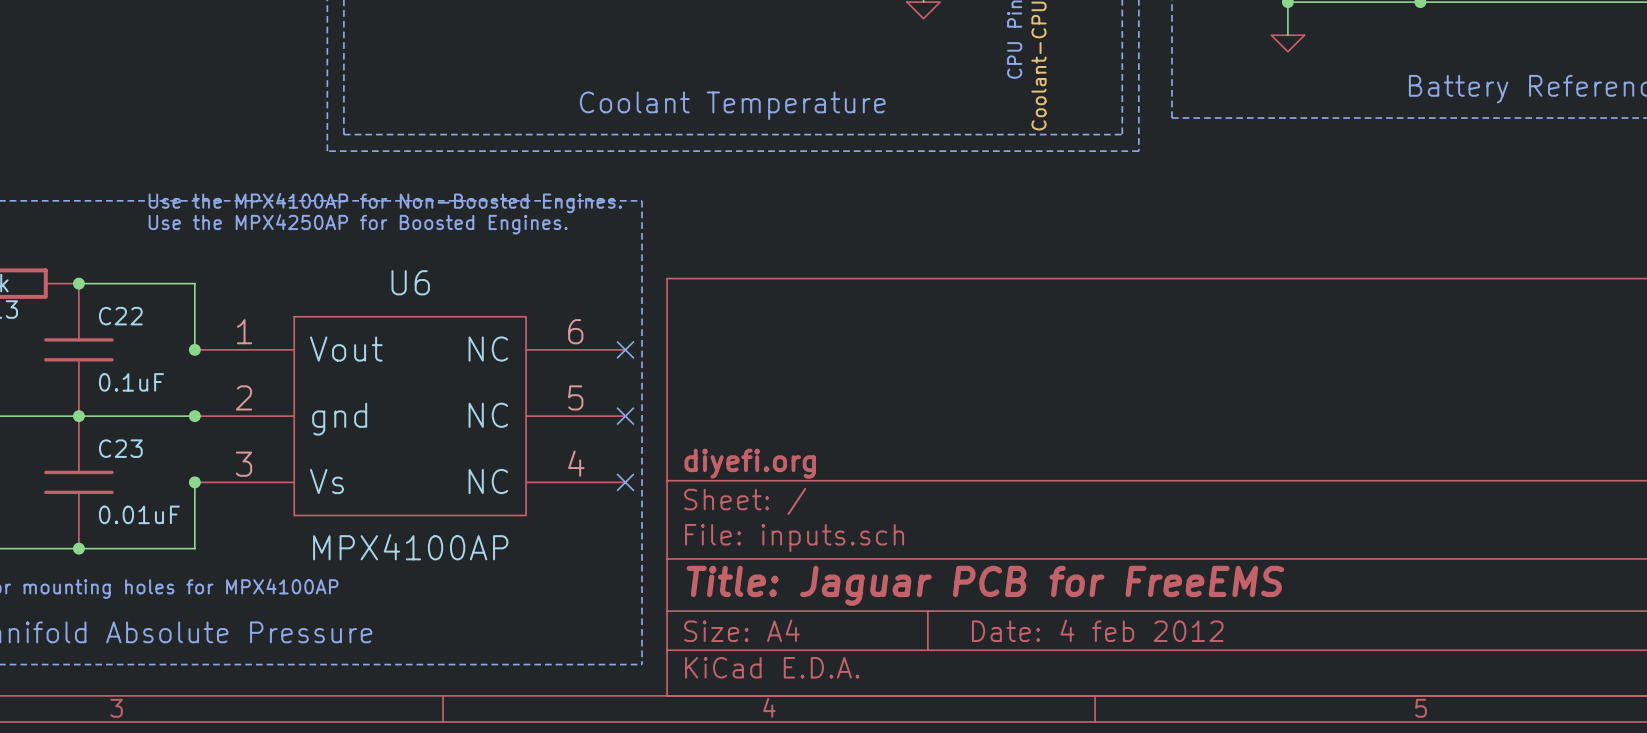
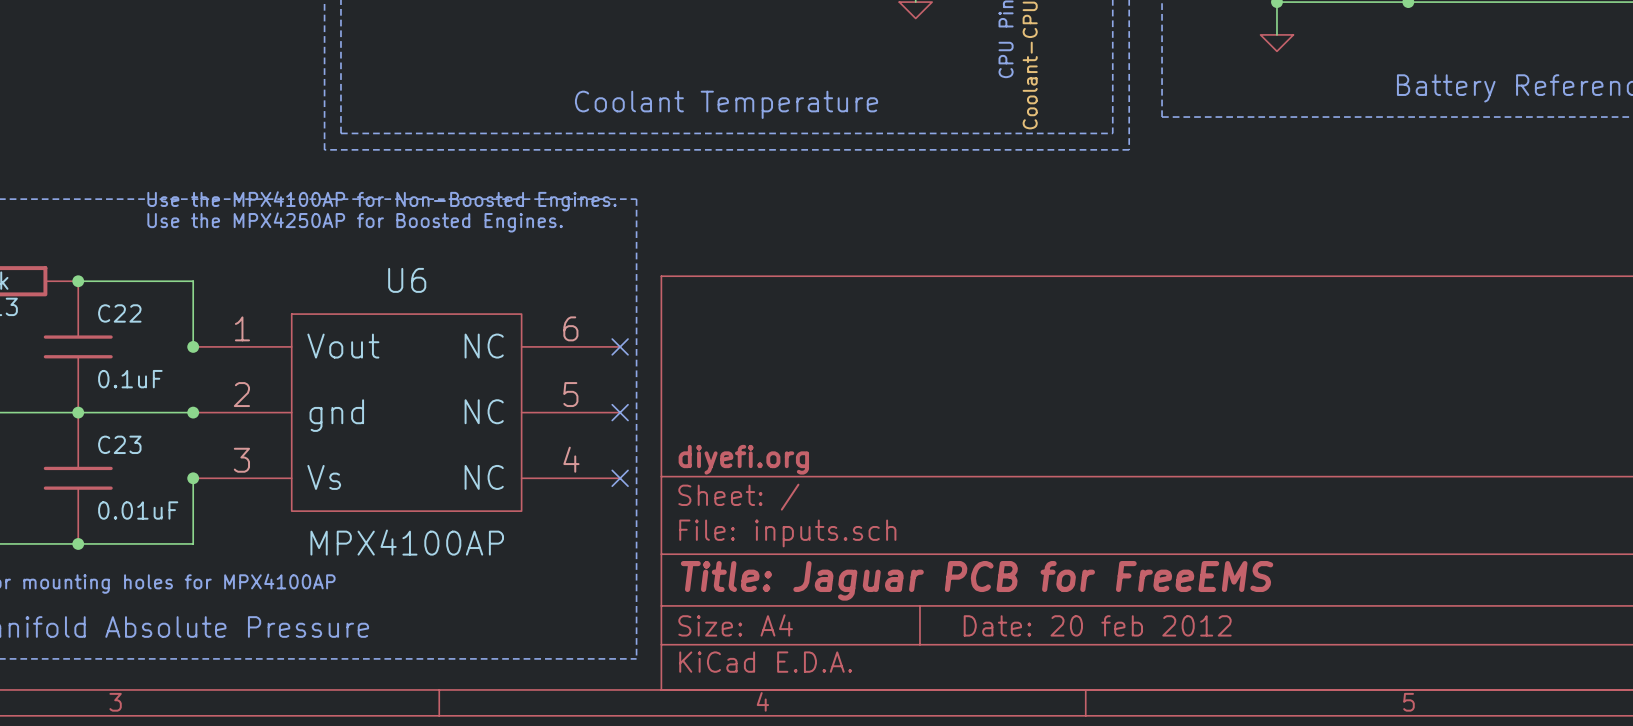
title block: Date: 4 feb 2012 (1097, 630) -> Date: 20 feb 2012 (1097, 625)

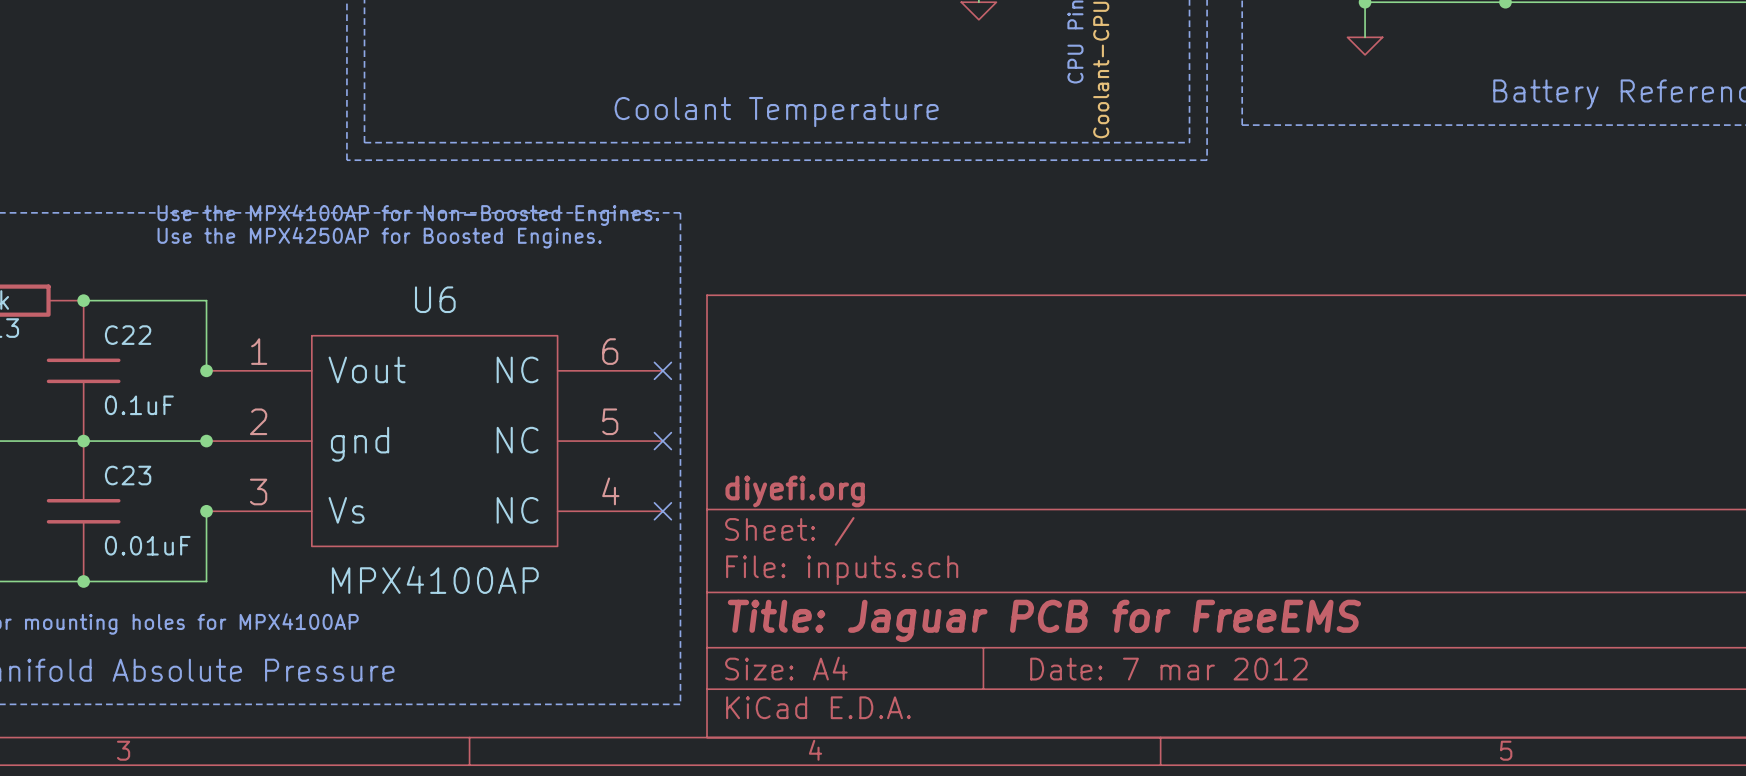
title block: Date: 20 feb 2012 (1097, 625) -> Date: 7 mar 2012 (1168, 669)

